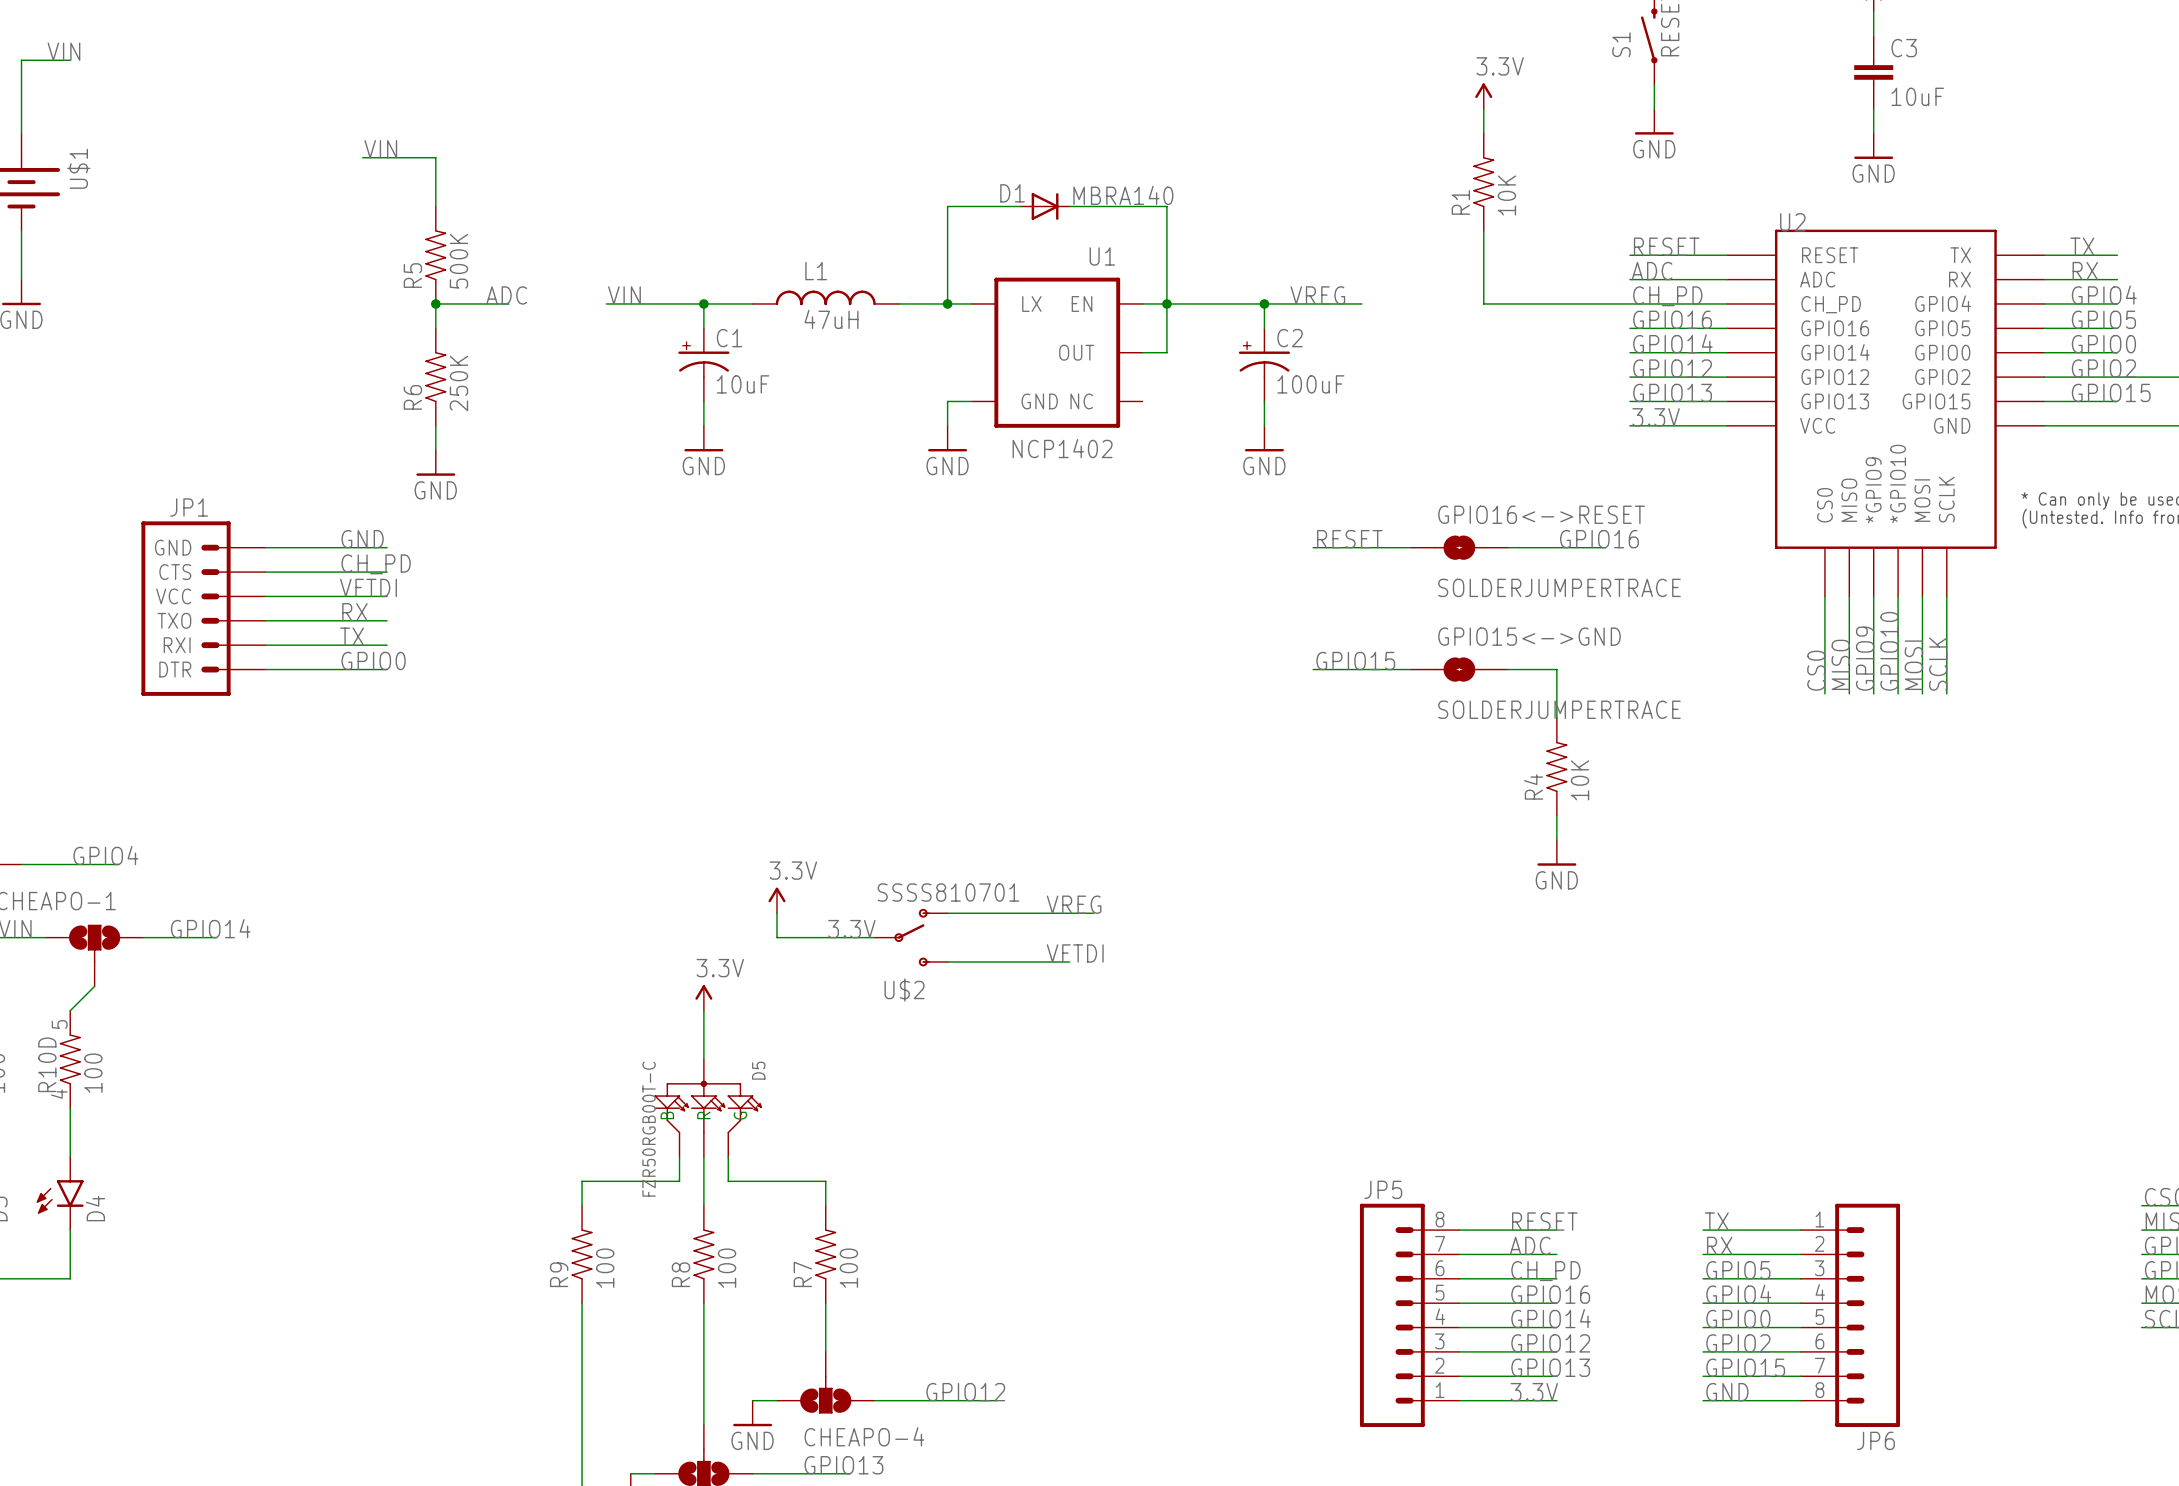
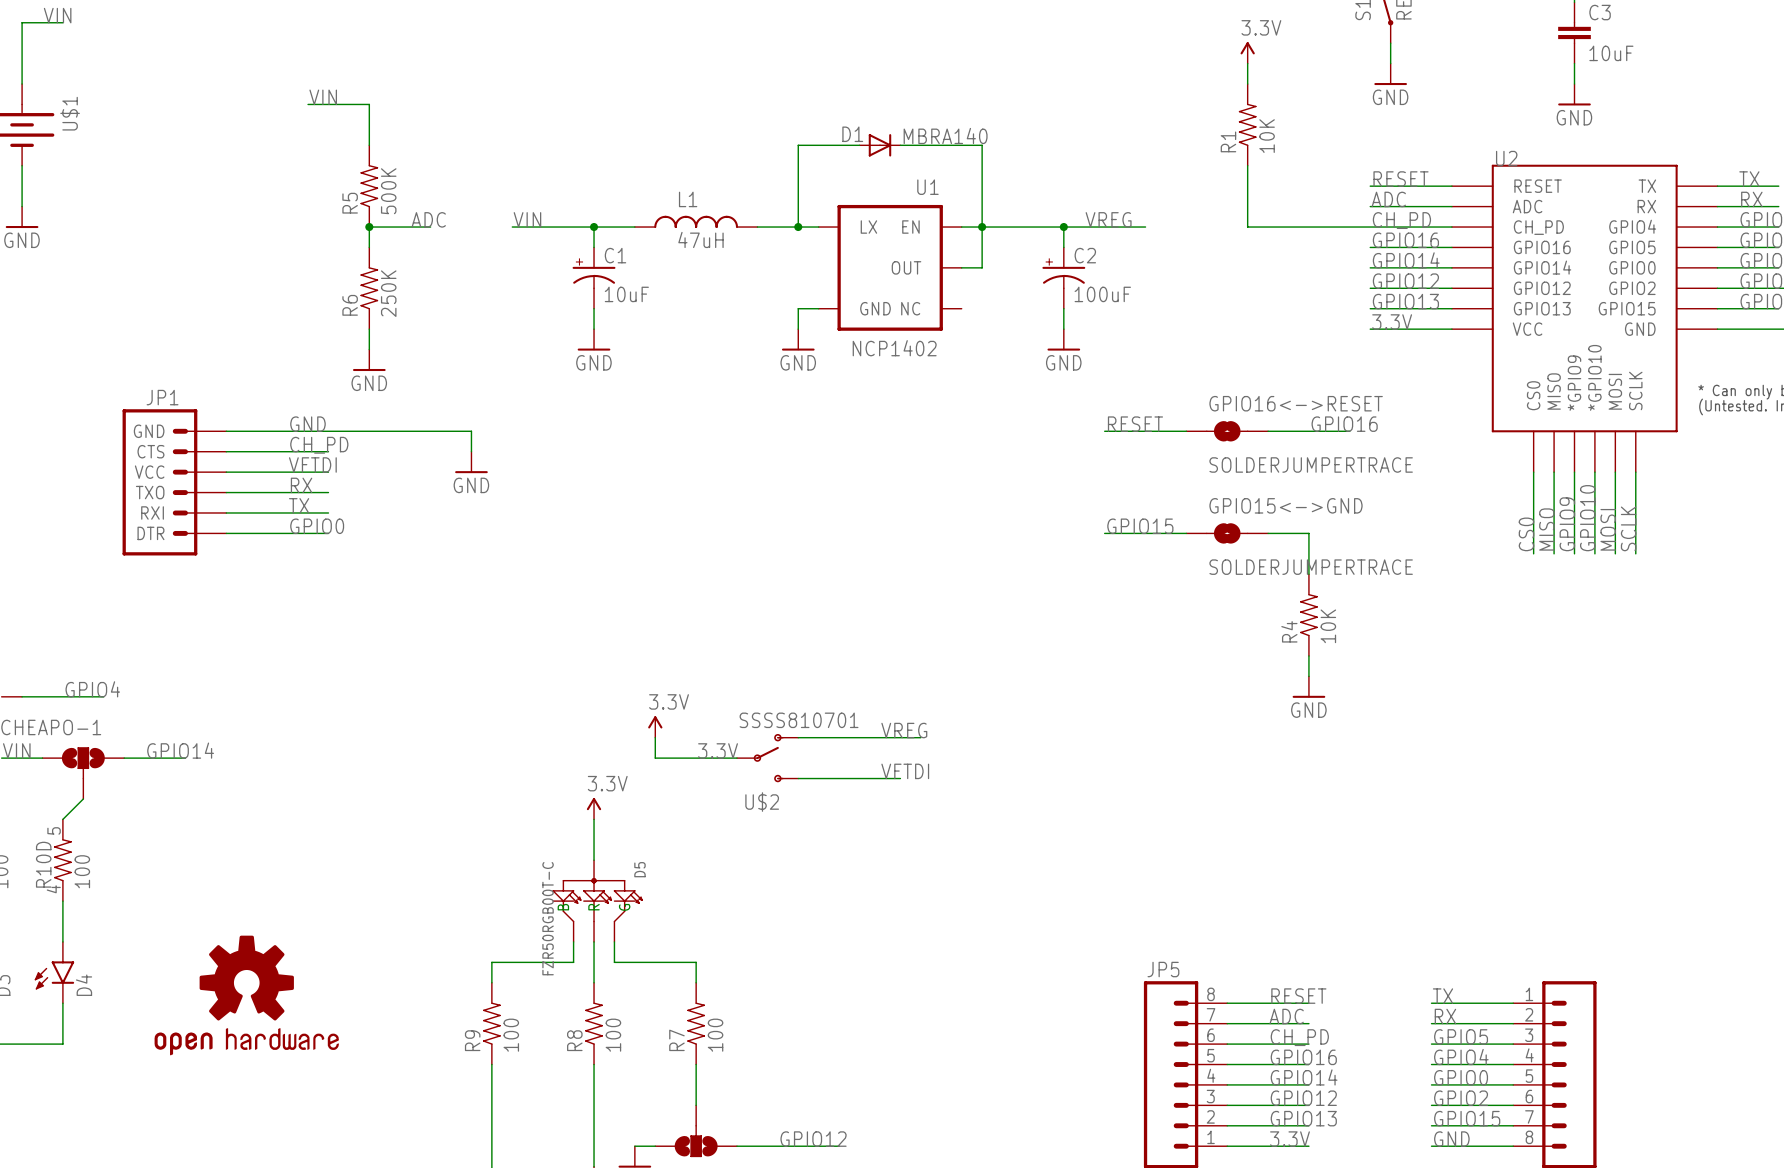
wire: none -> (328, 431) (471, 431) (471, 451)
power symbol: none -> GND (471, 462)
part: none -> (246, 995)

